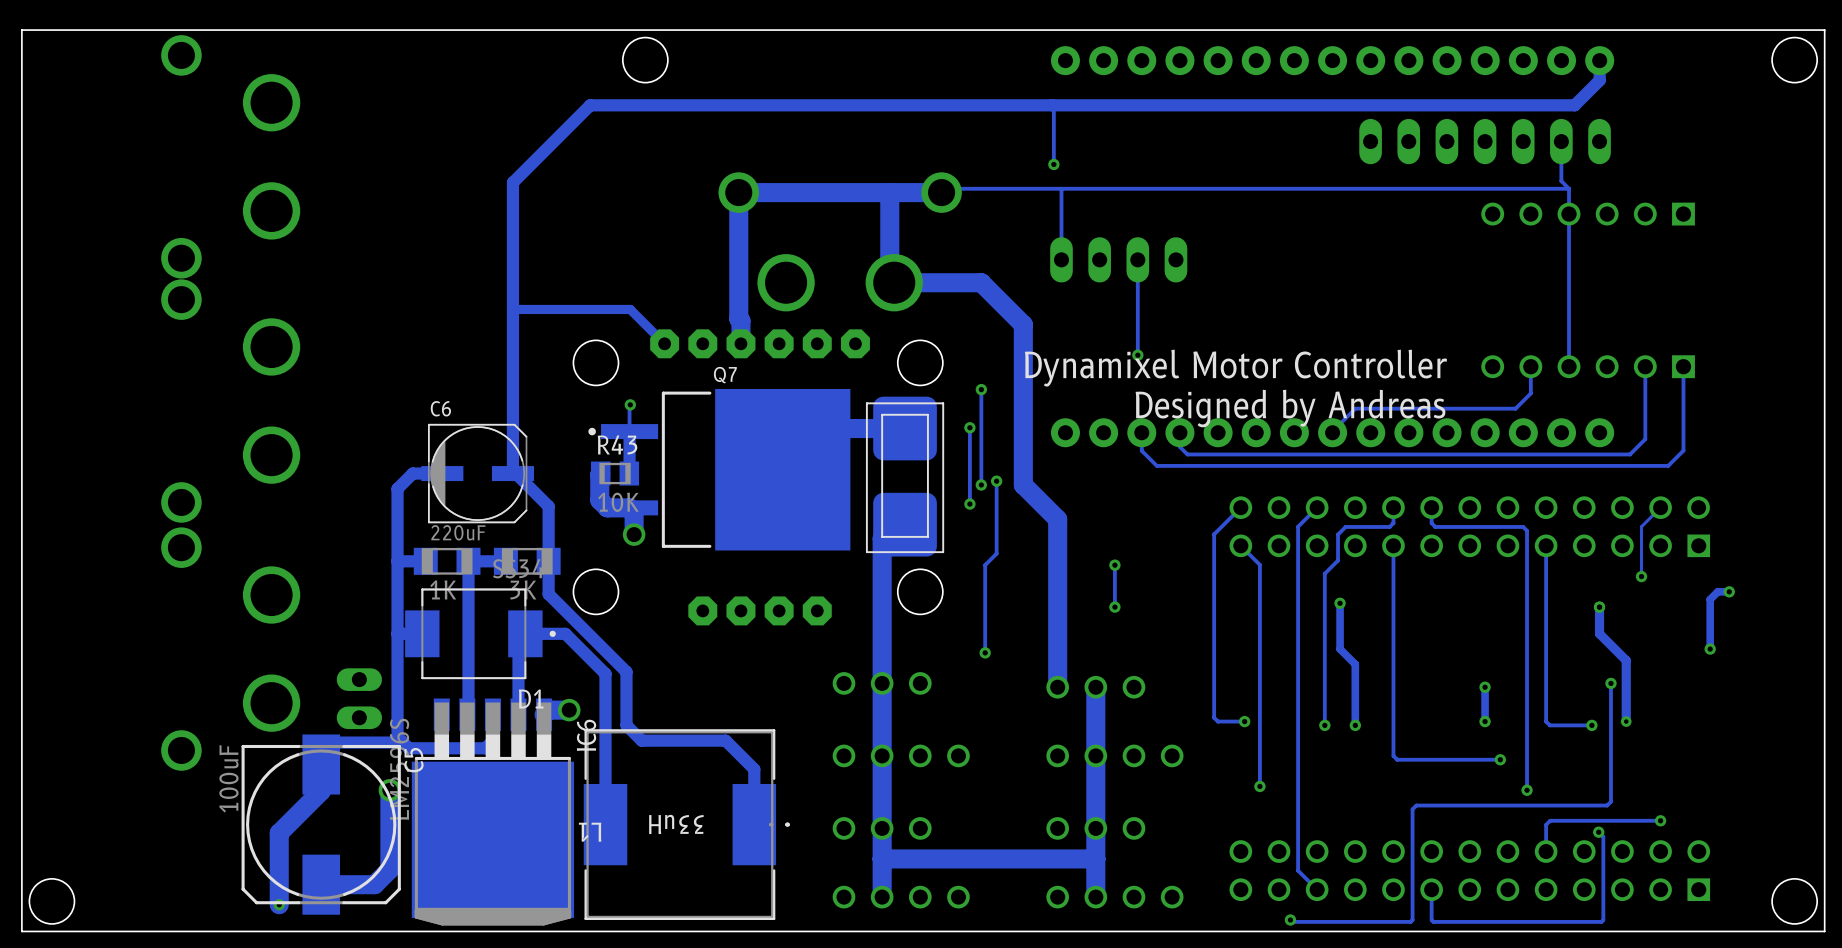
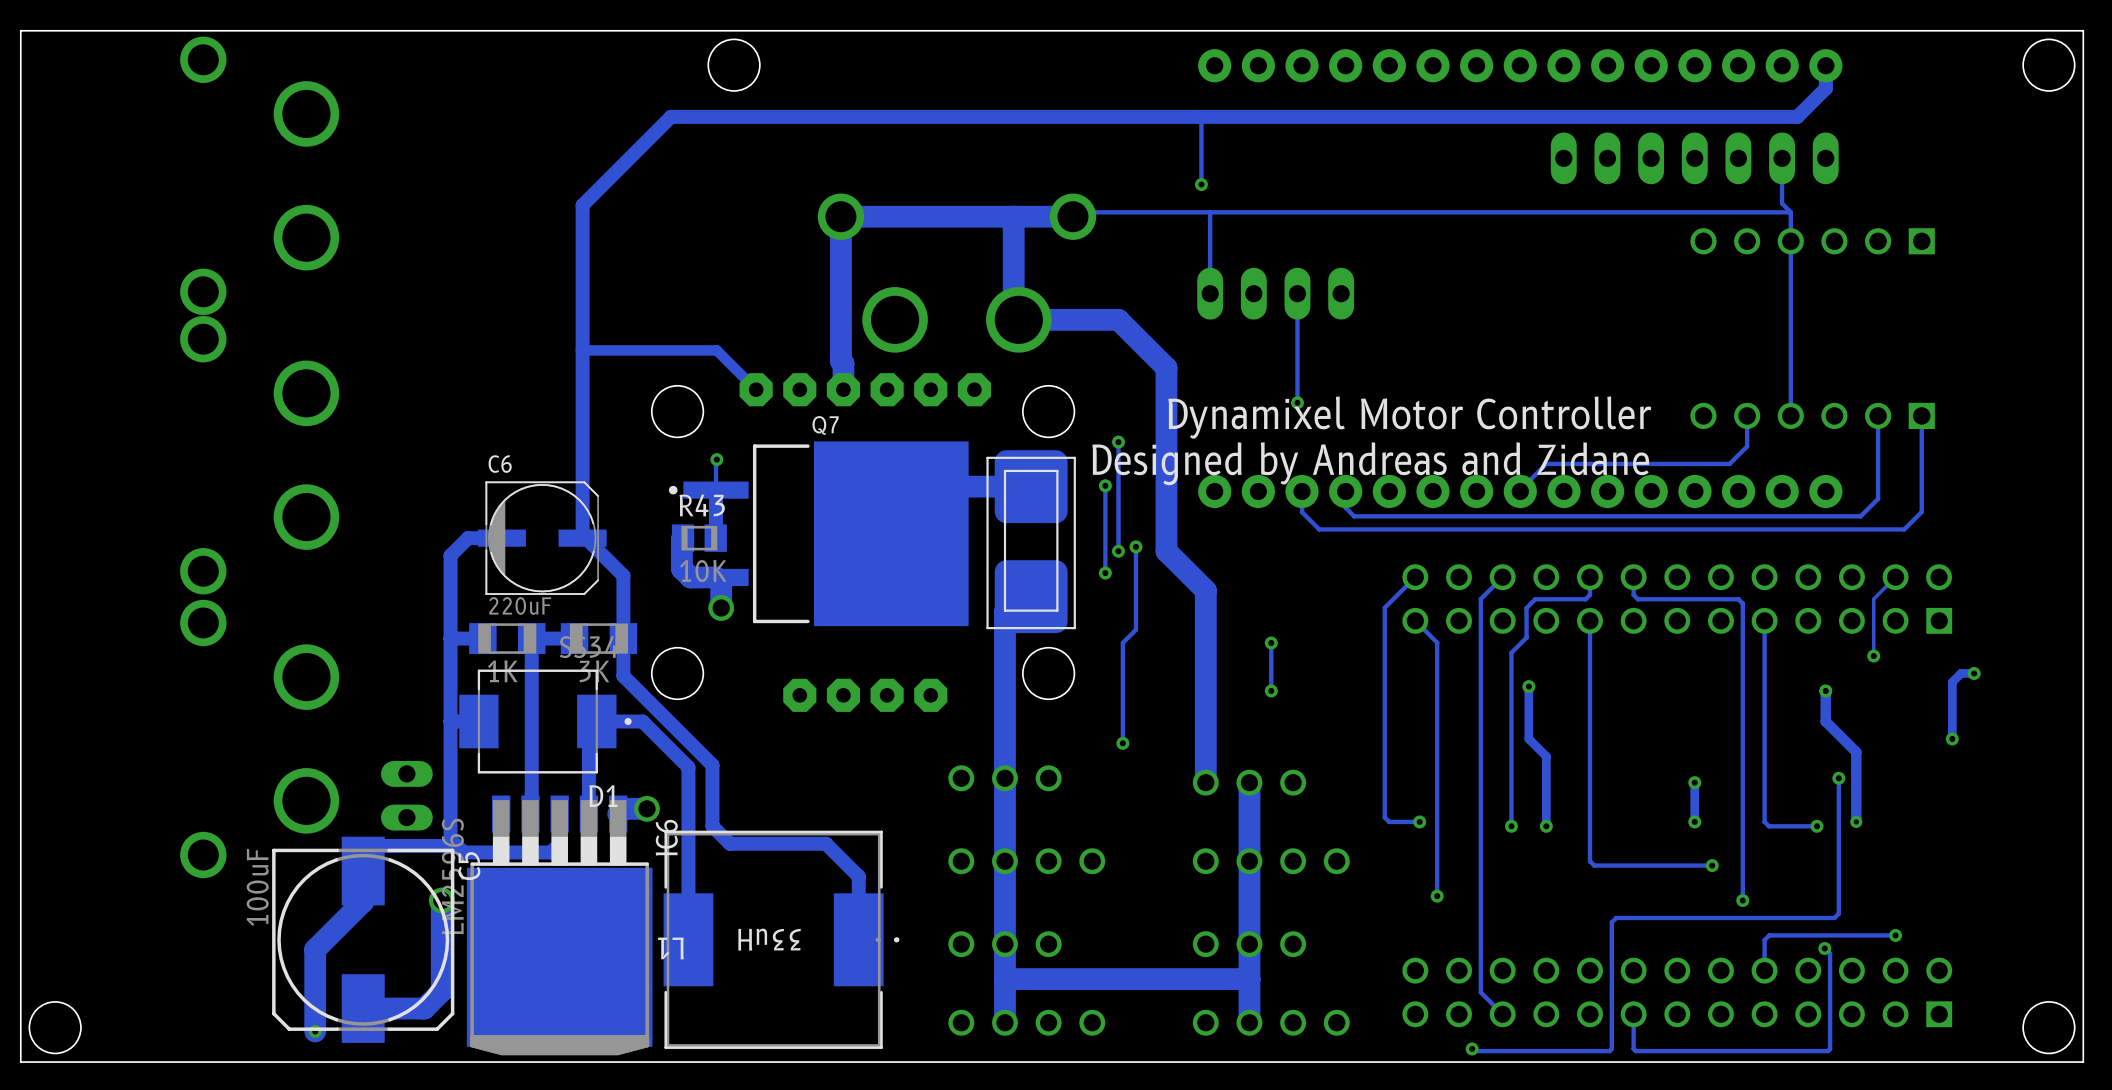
text: Designed by Andreas (1290, 408) -> Designed by Andreas and Zidane (1370, 463)

